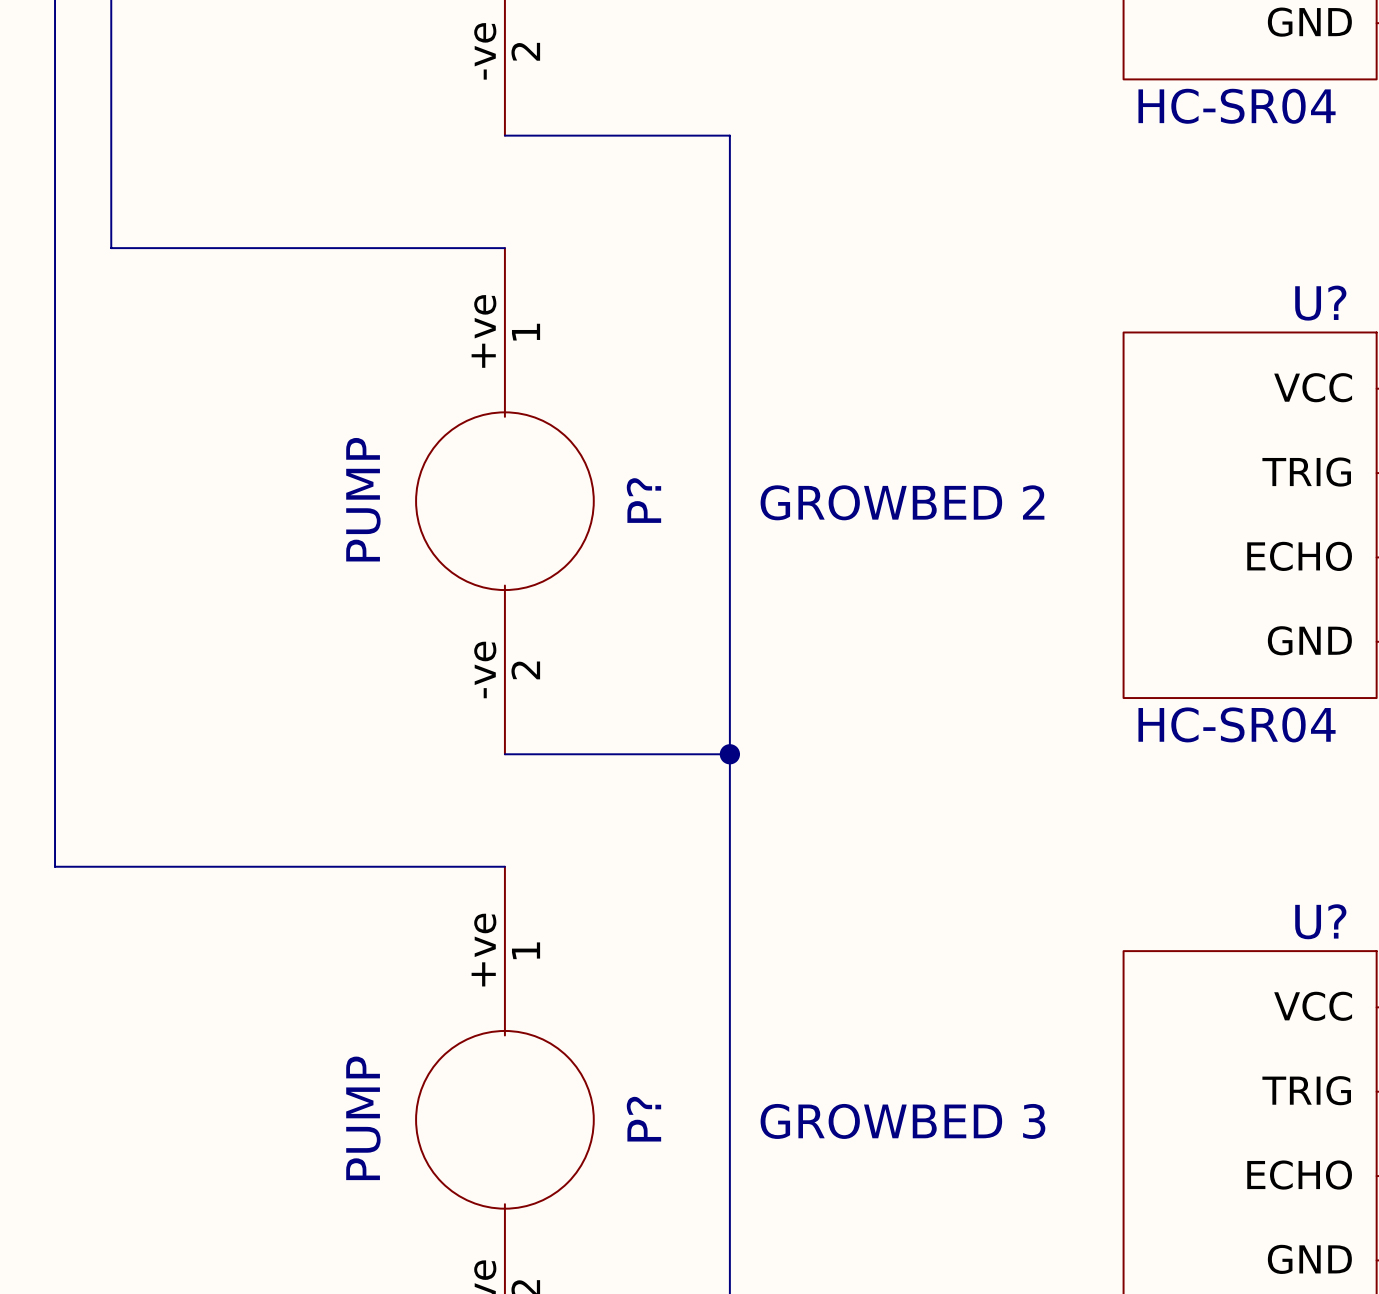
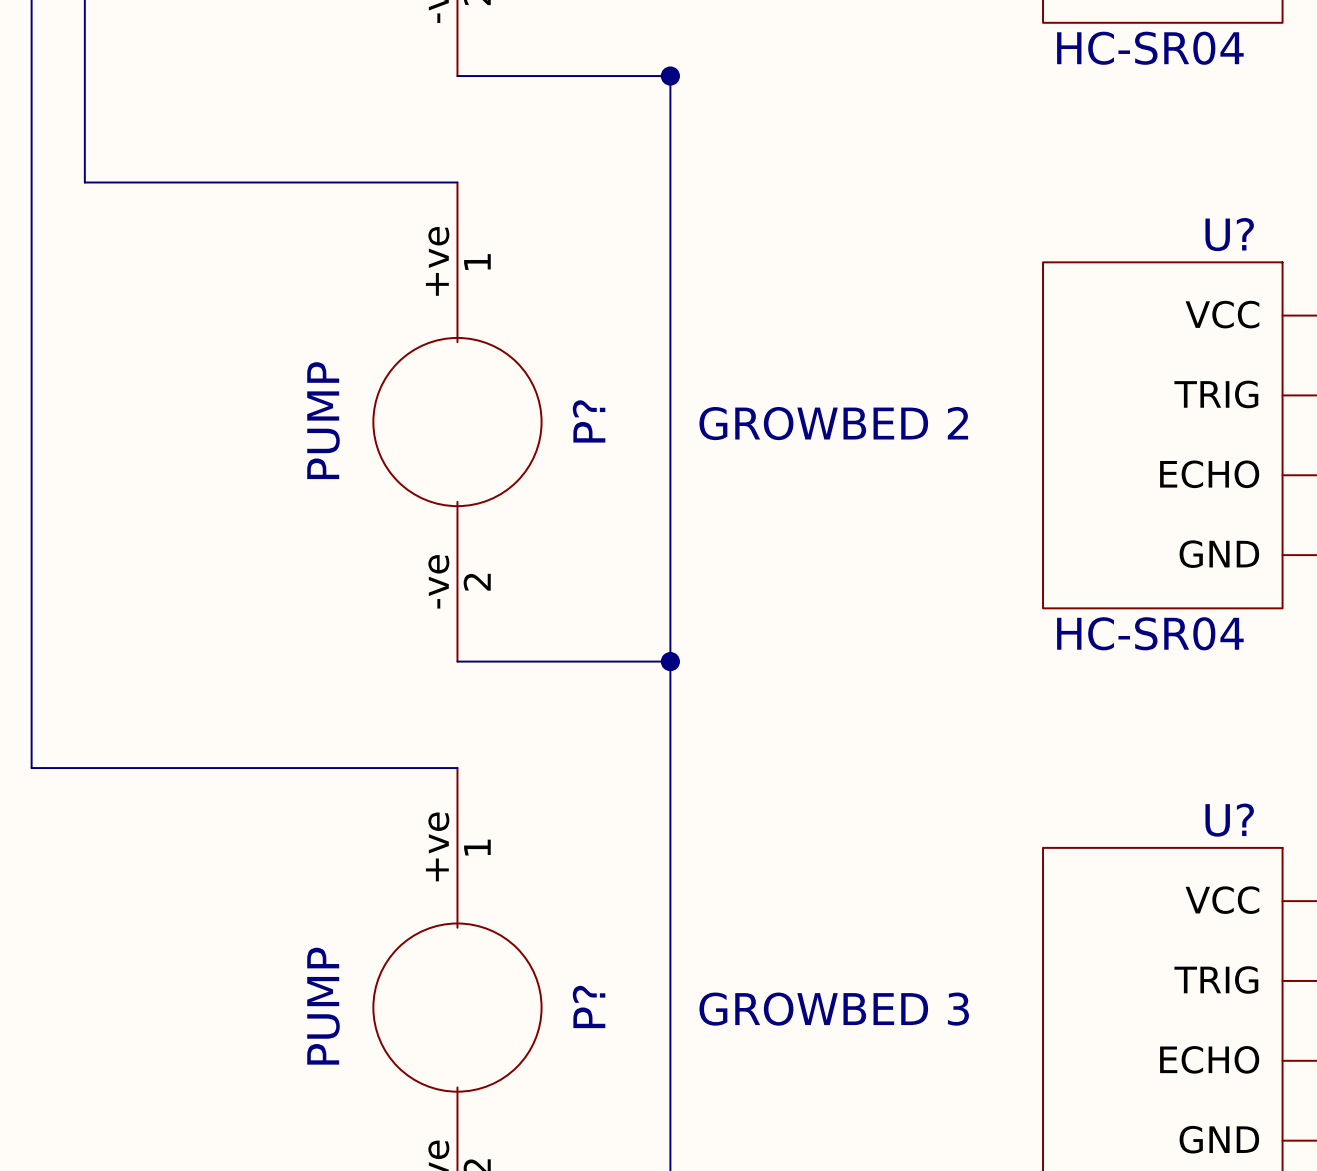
junction: none -> (670, 76)

